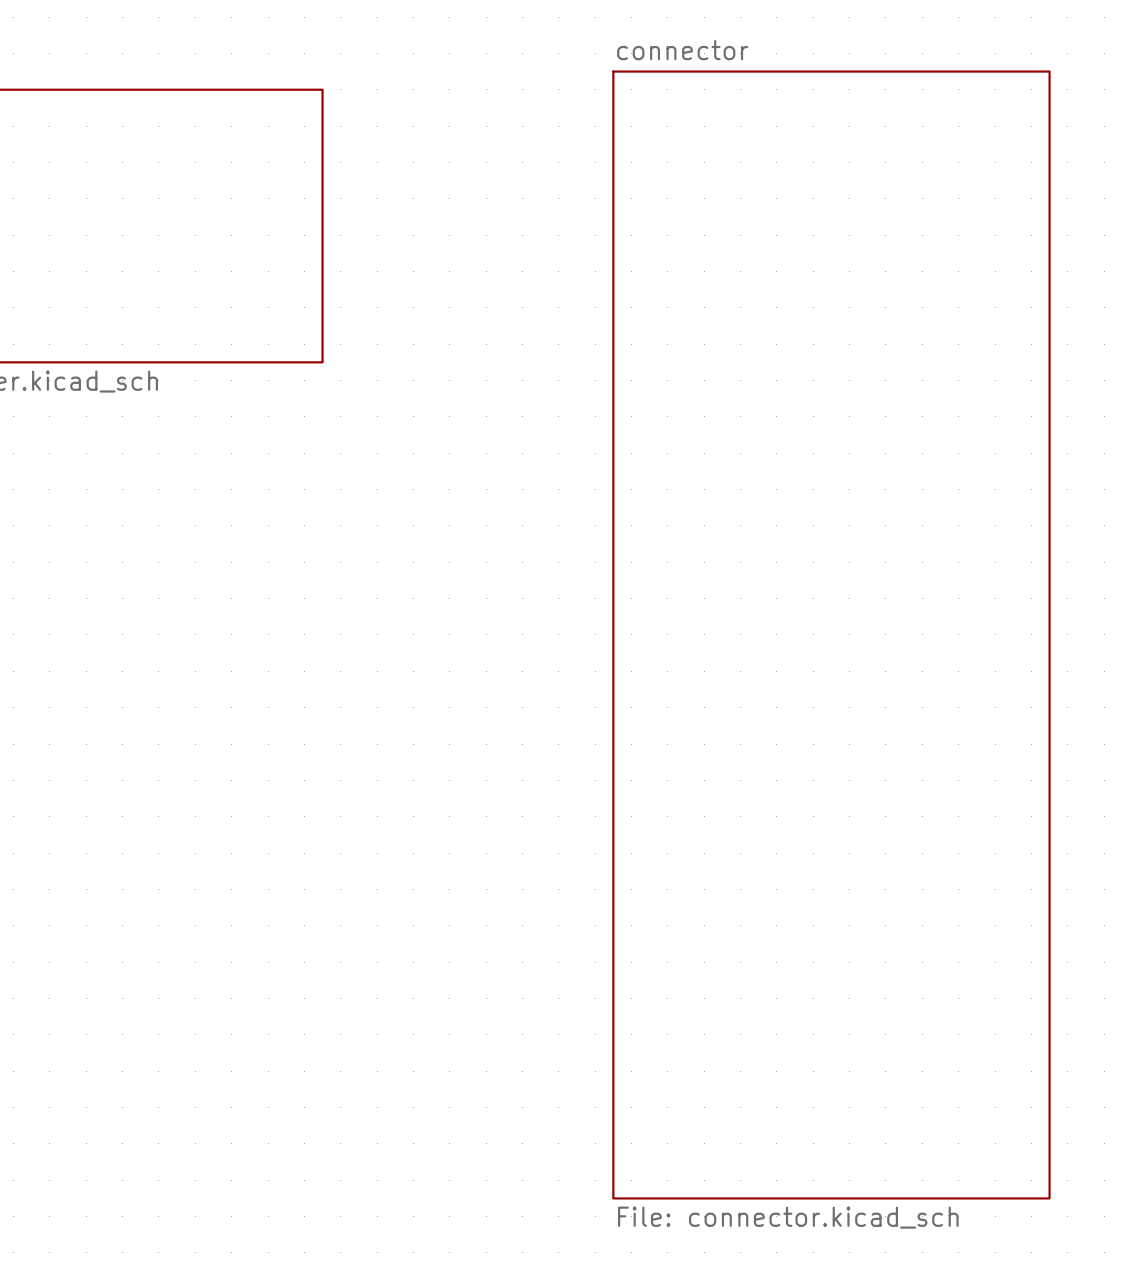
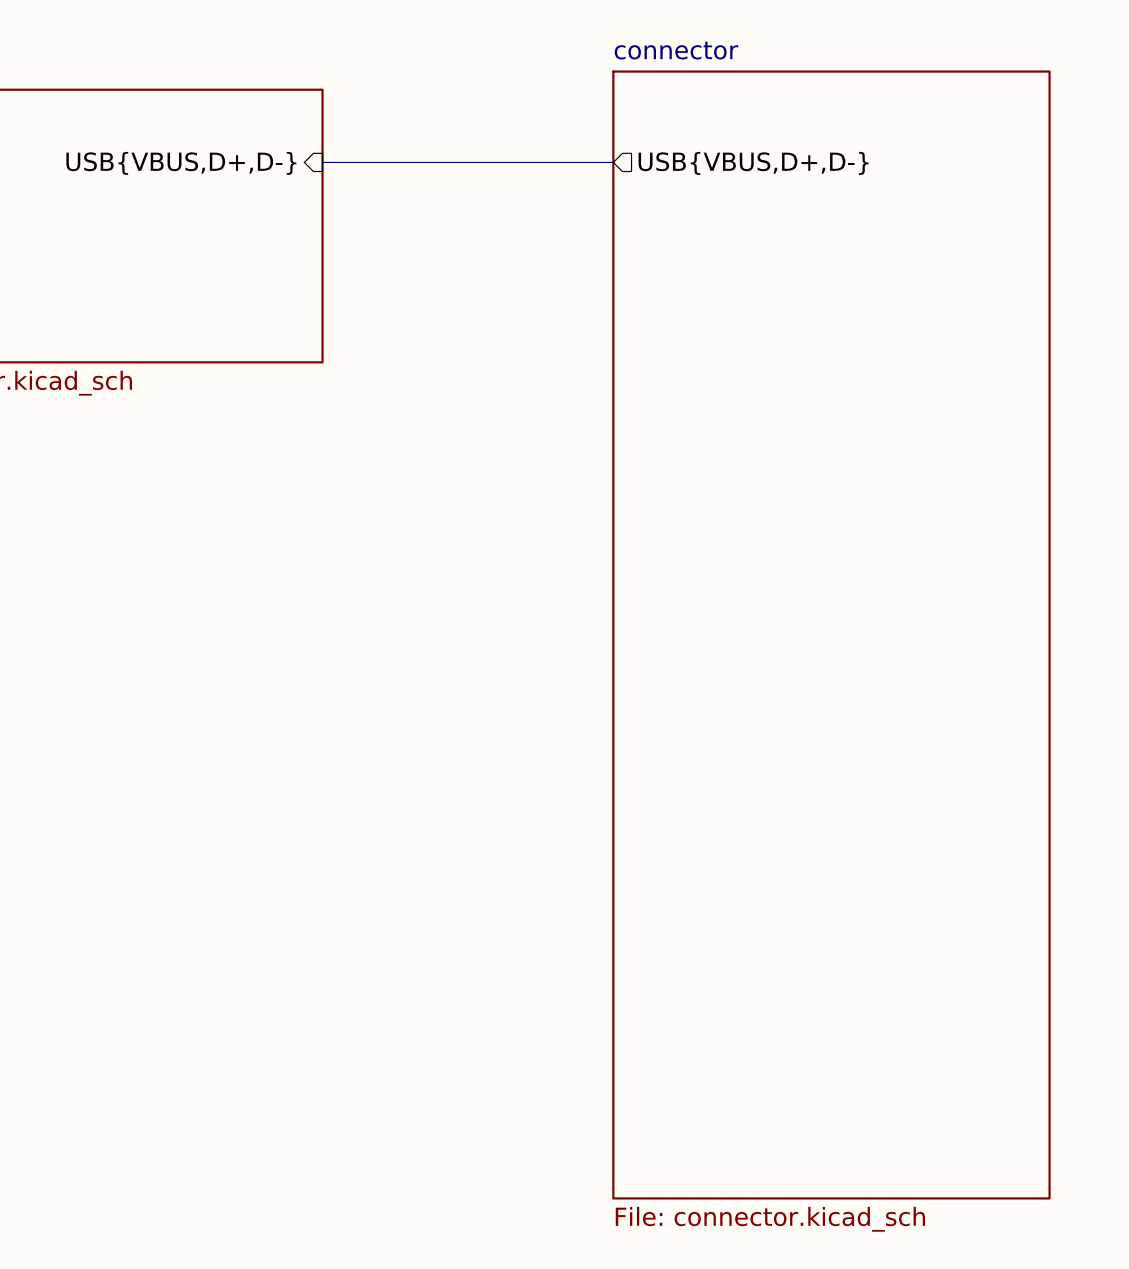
bus: none -> (322, 162) (613, 162)
sheet pin: none -> USB{VBUS,D+,D-} (181, 163)
sheet pin: none -> USB{VBUS,D+,D-} (753, 163)

